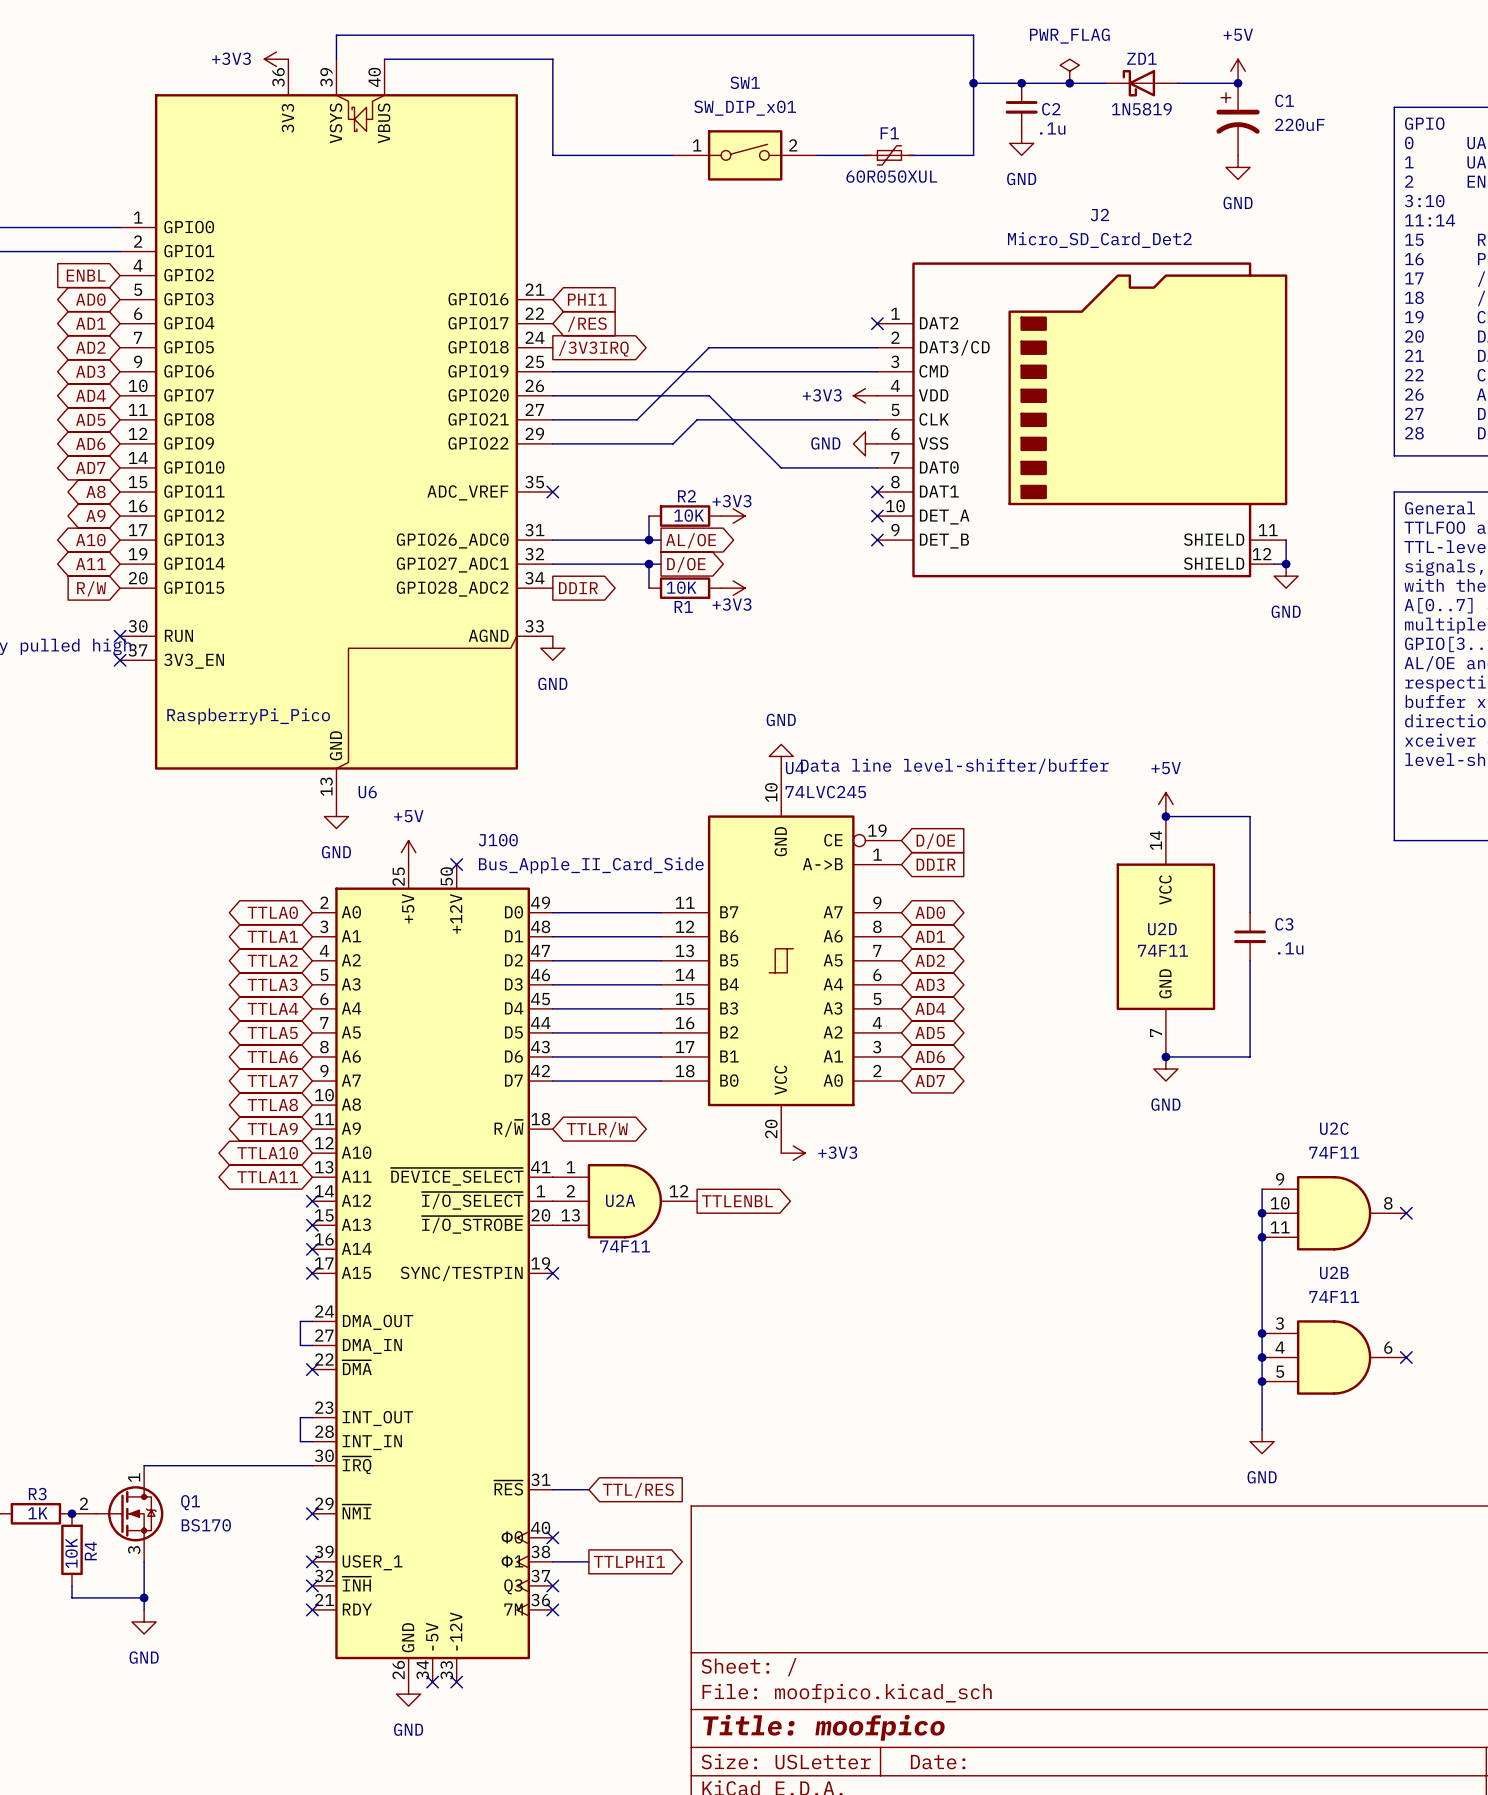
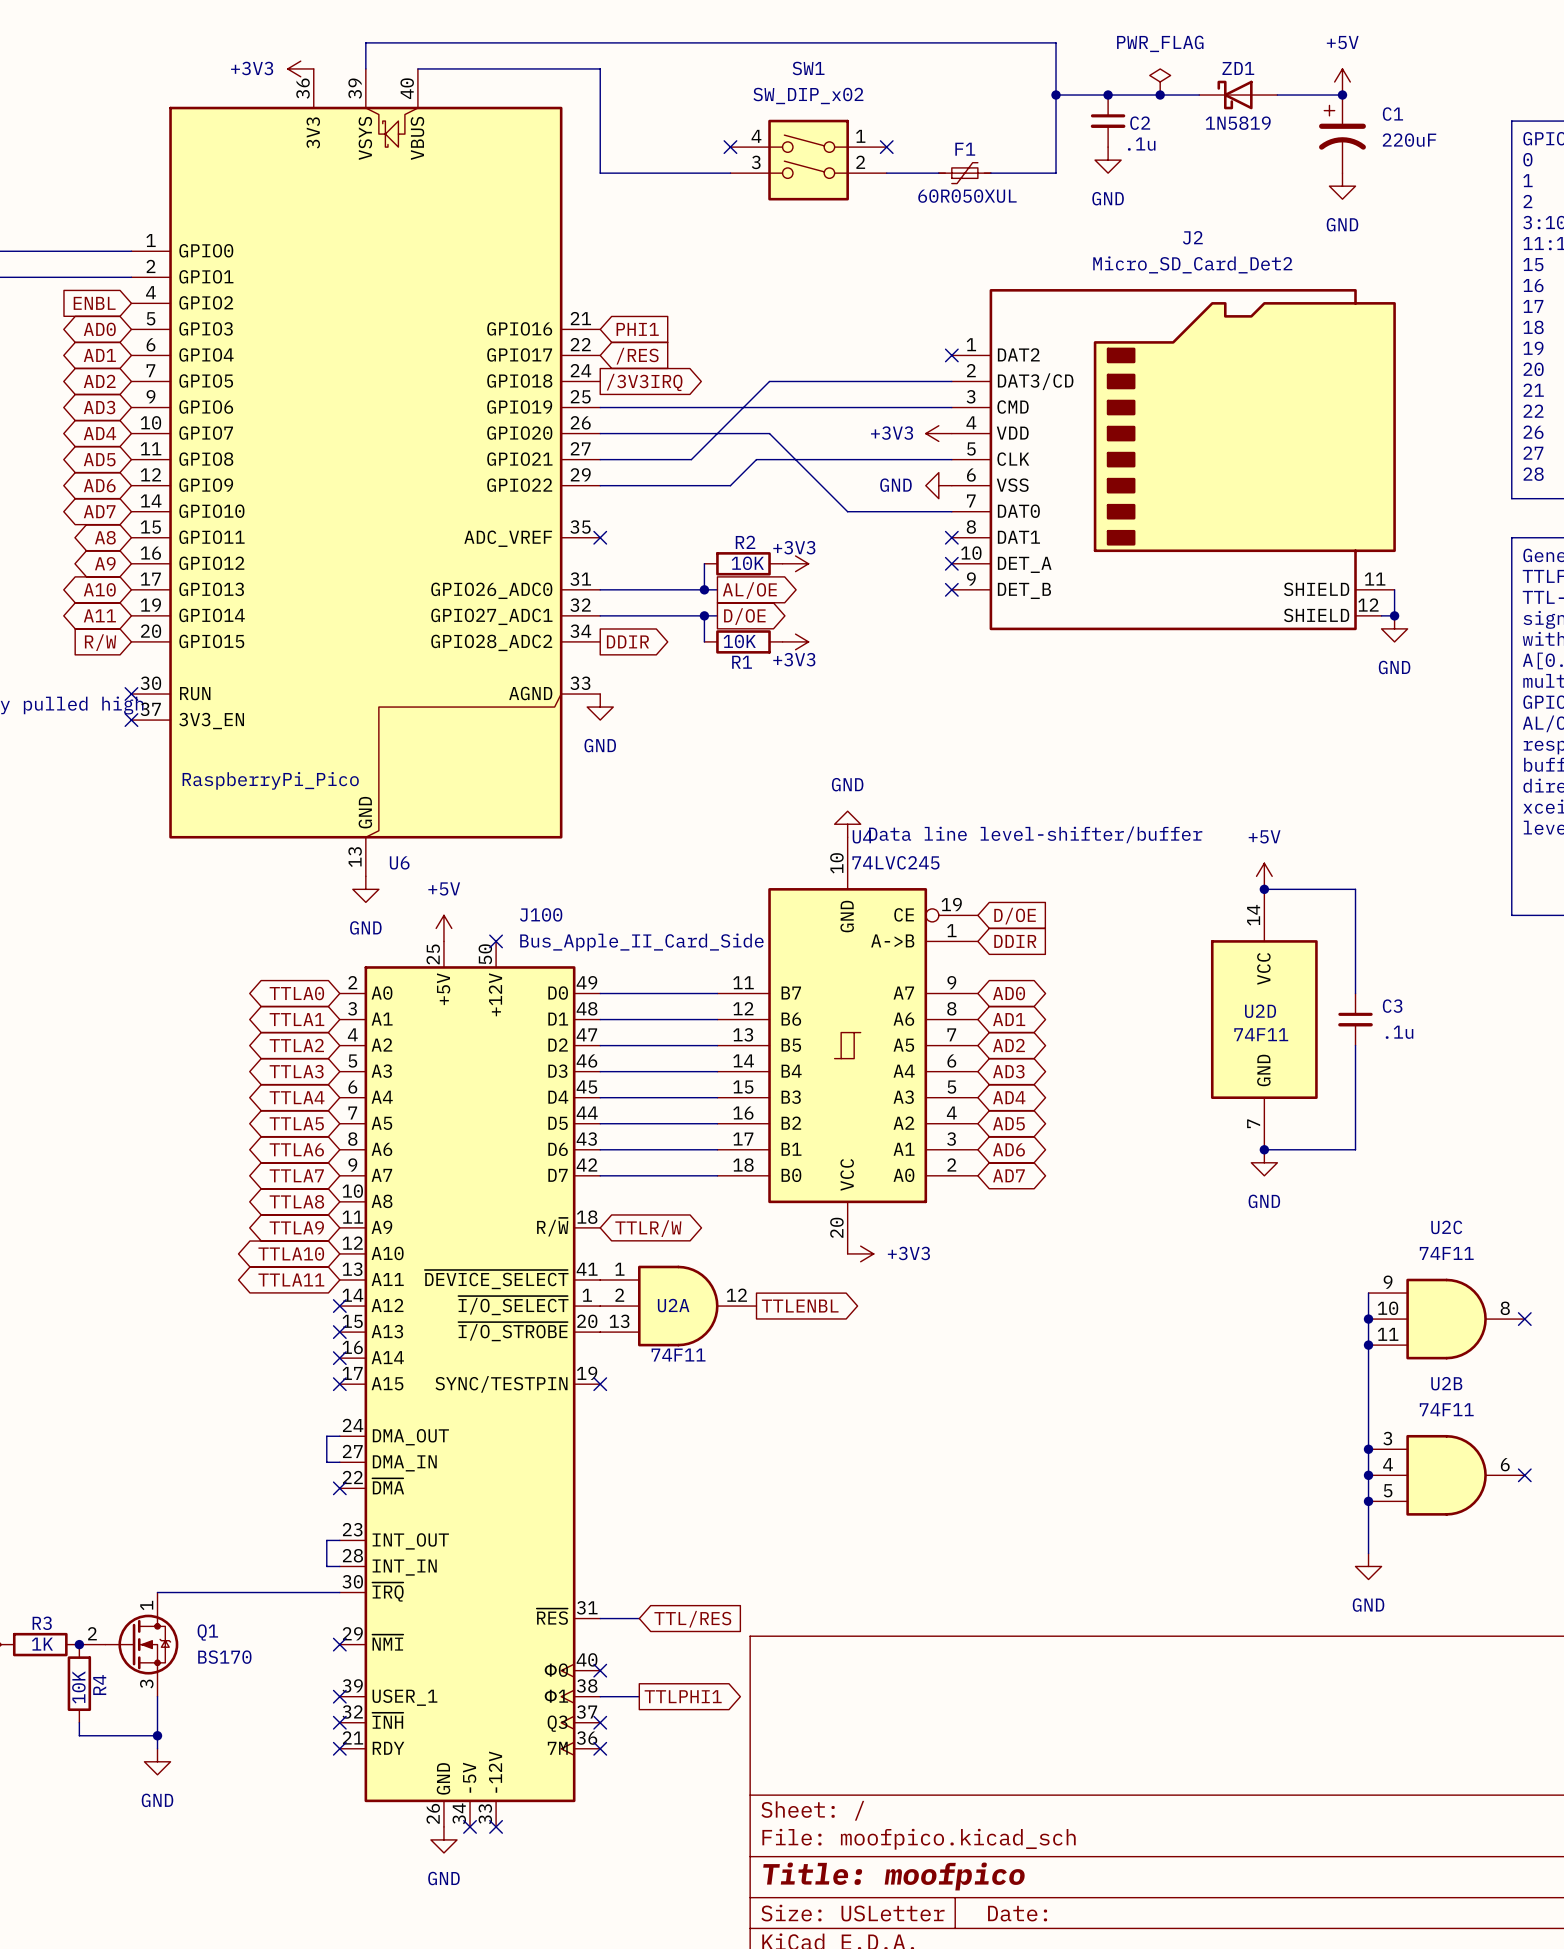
SW1 value: SW_DIP_x01 (745, 108) -> SW_DIP_x02 (808, 95)
SW1 symbol: [673, 130, 818, 181] -> [730, 119, 887, 201]
no-connect mark: none -> (730, 147)
no-connect mark: none -> (886, 147)

